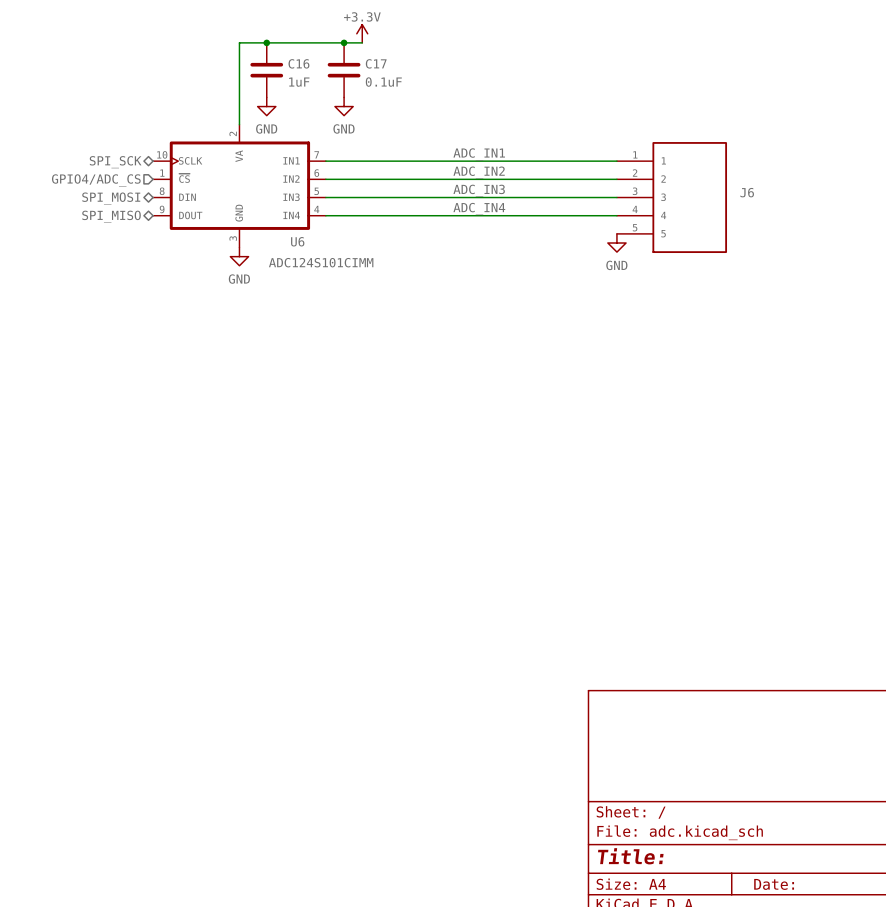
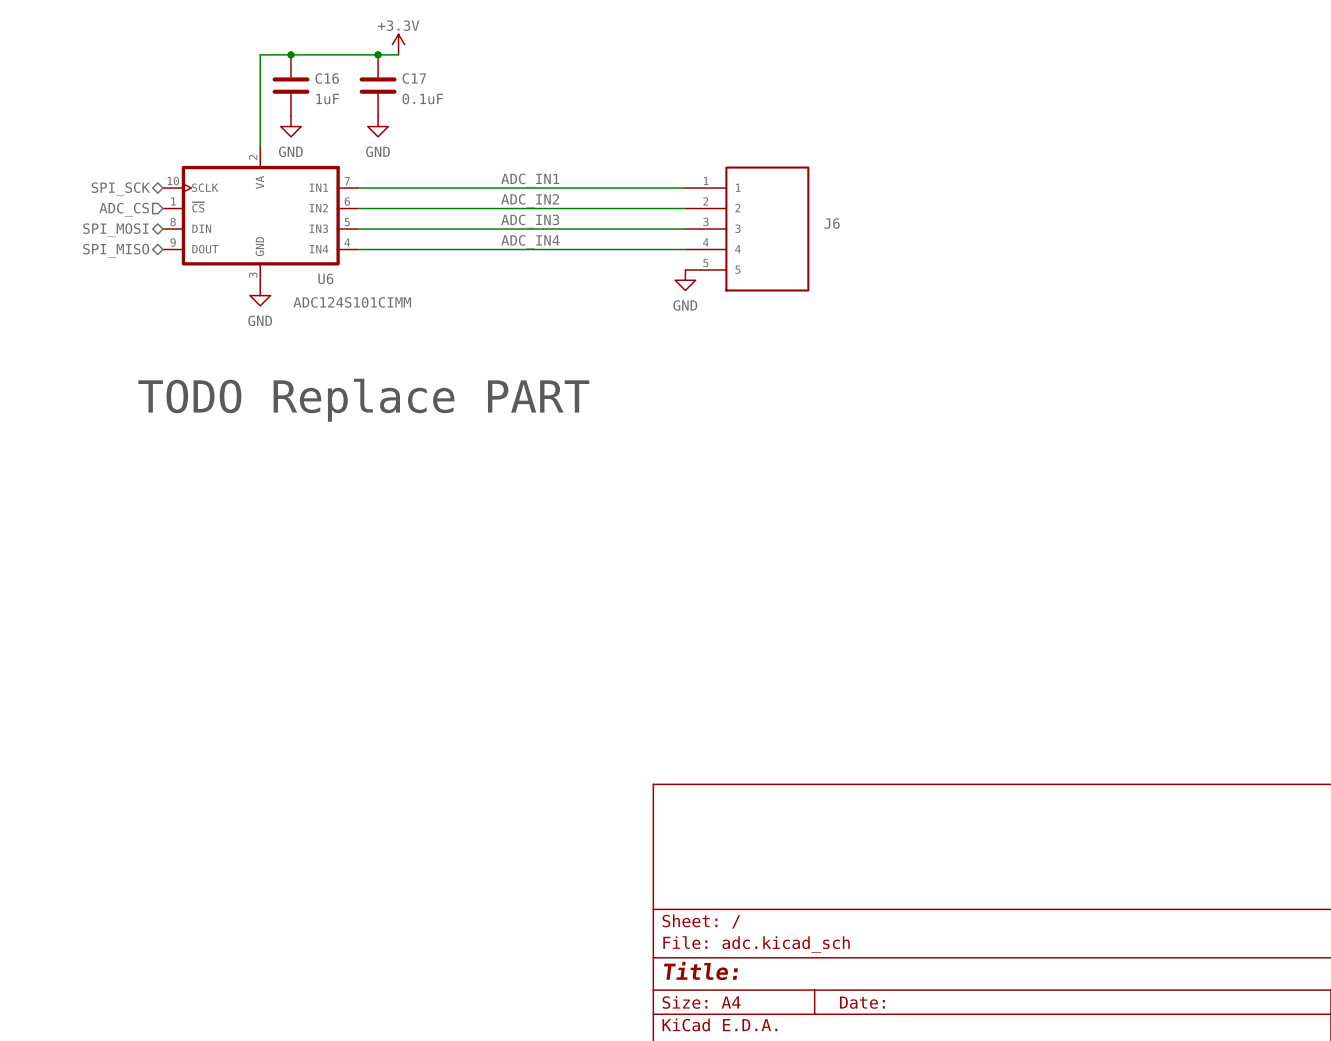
hierarchical label: GPIO4/ADC_CS (96, 180) -> ADC_CS (124, 209)
text: none -> TODO Replace PART (363, 400)

